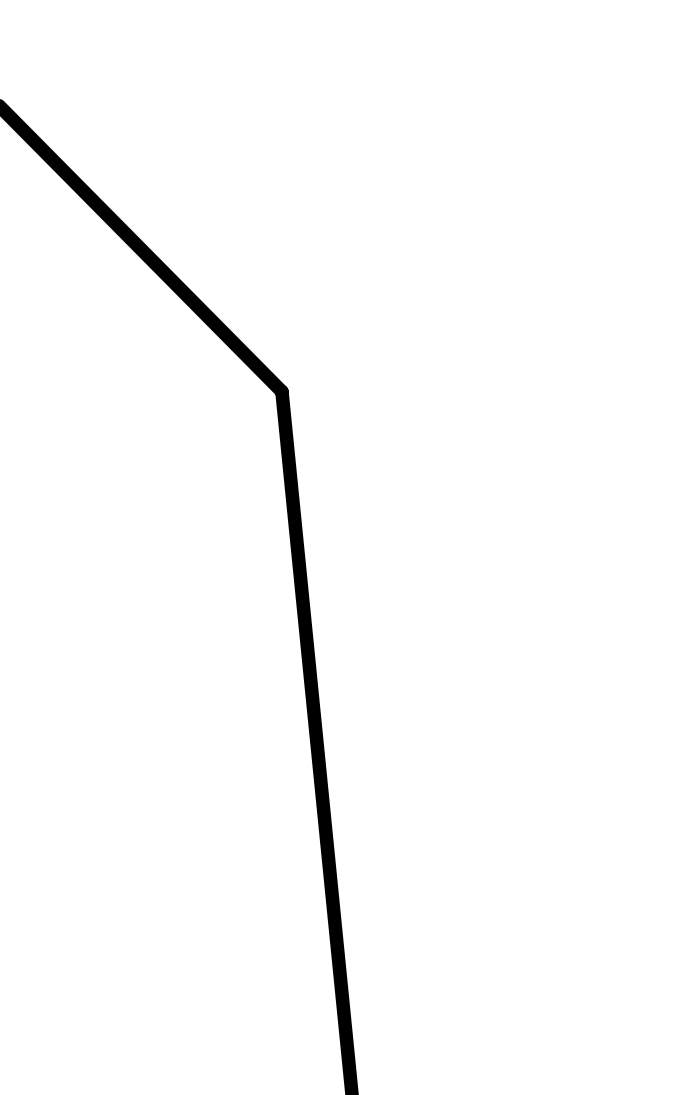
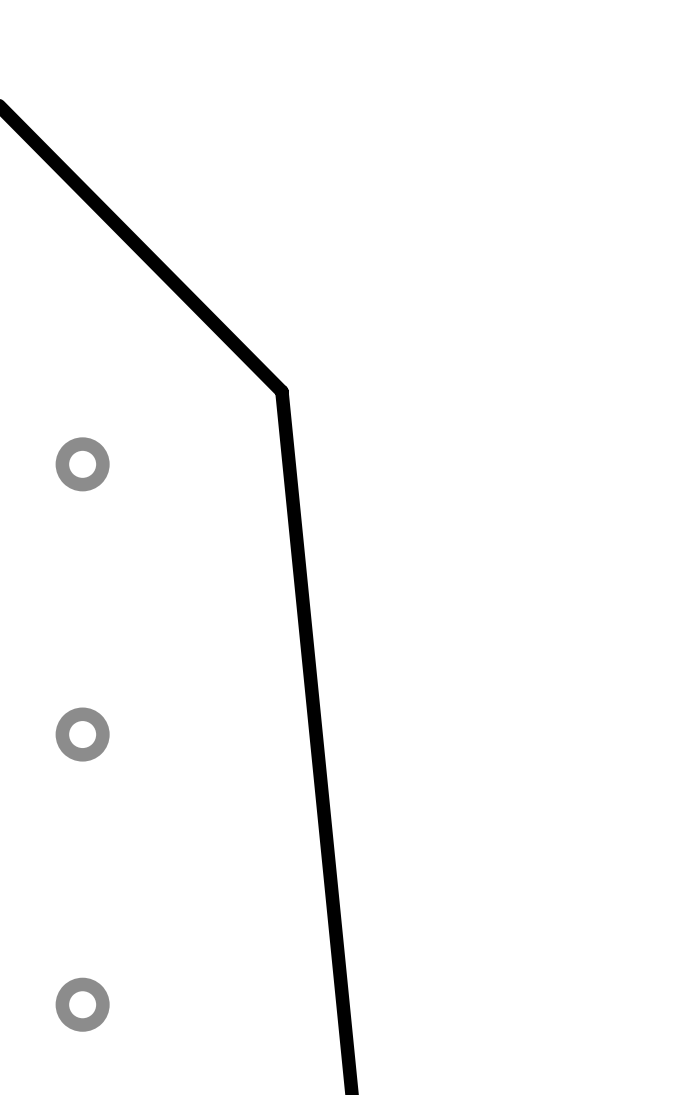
via: none -> (82, 464)
via: none -> (82, 734)
via: none -> (82, 1004)

